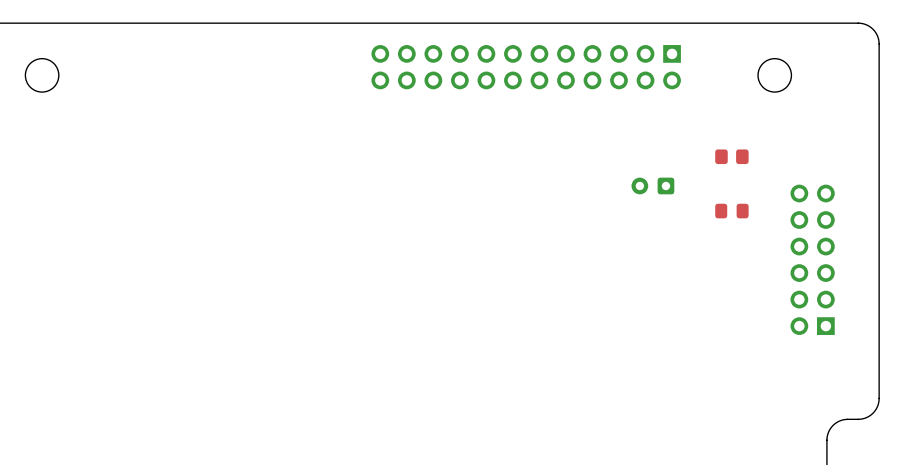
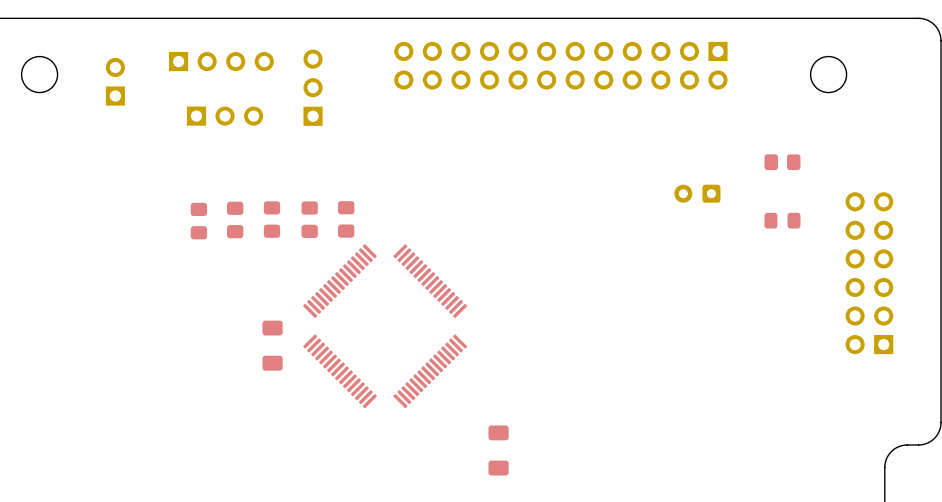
part: none -> (221, 61)
part: none -> (115, 81)
part: none -> (313, 87)
part: none -> (225, 116)
part: none -> (271, 219)
part: none -> (346, 219)
part: none -> (235, 219)
part: none -> (309, 219)
part: none -> (198, 221)
part: none -> (385, 326)
part: none -> (272, 345)
part: none -> (498, 450)

